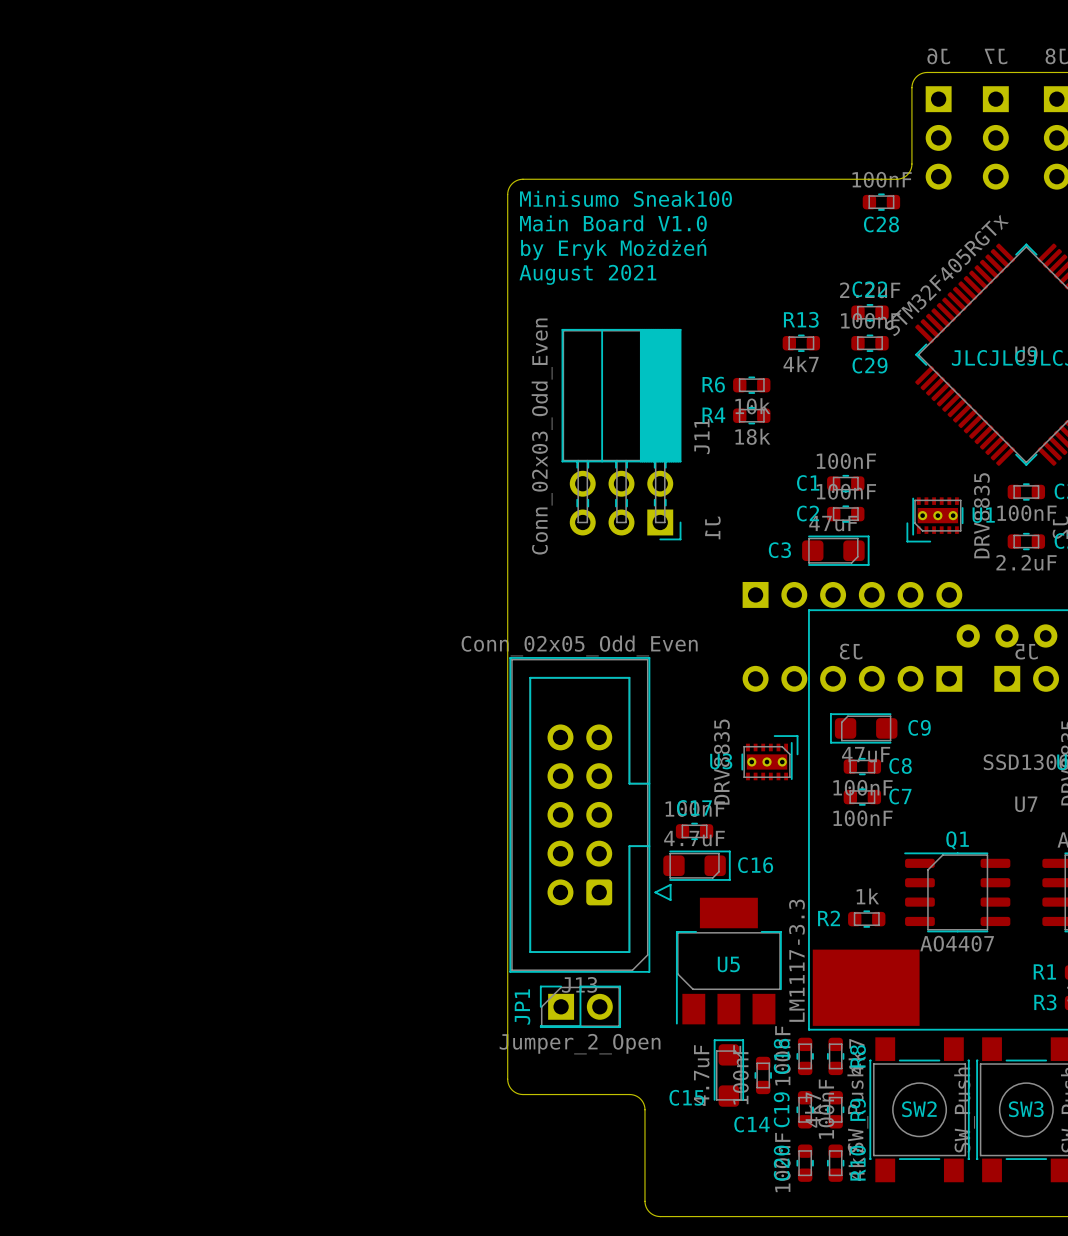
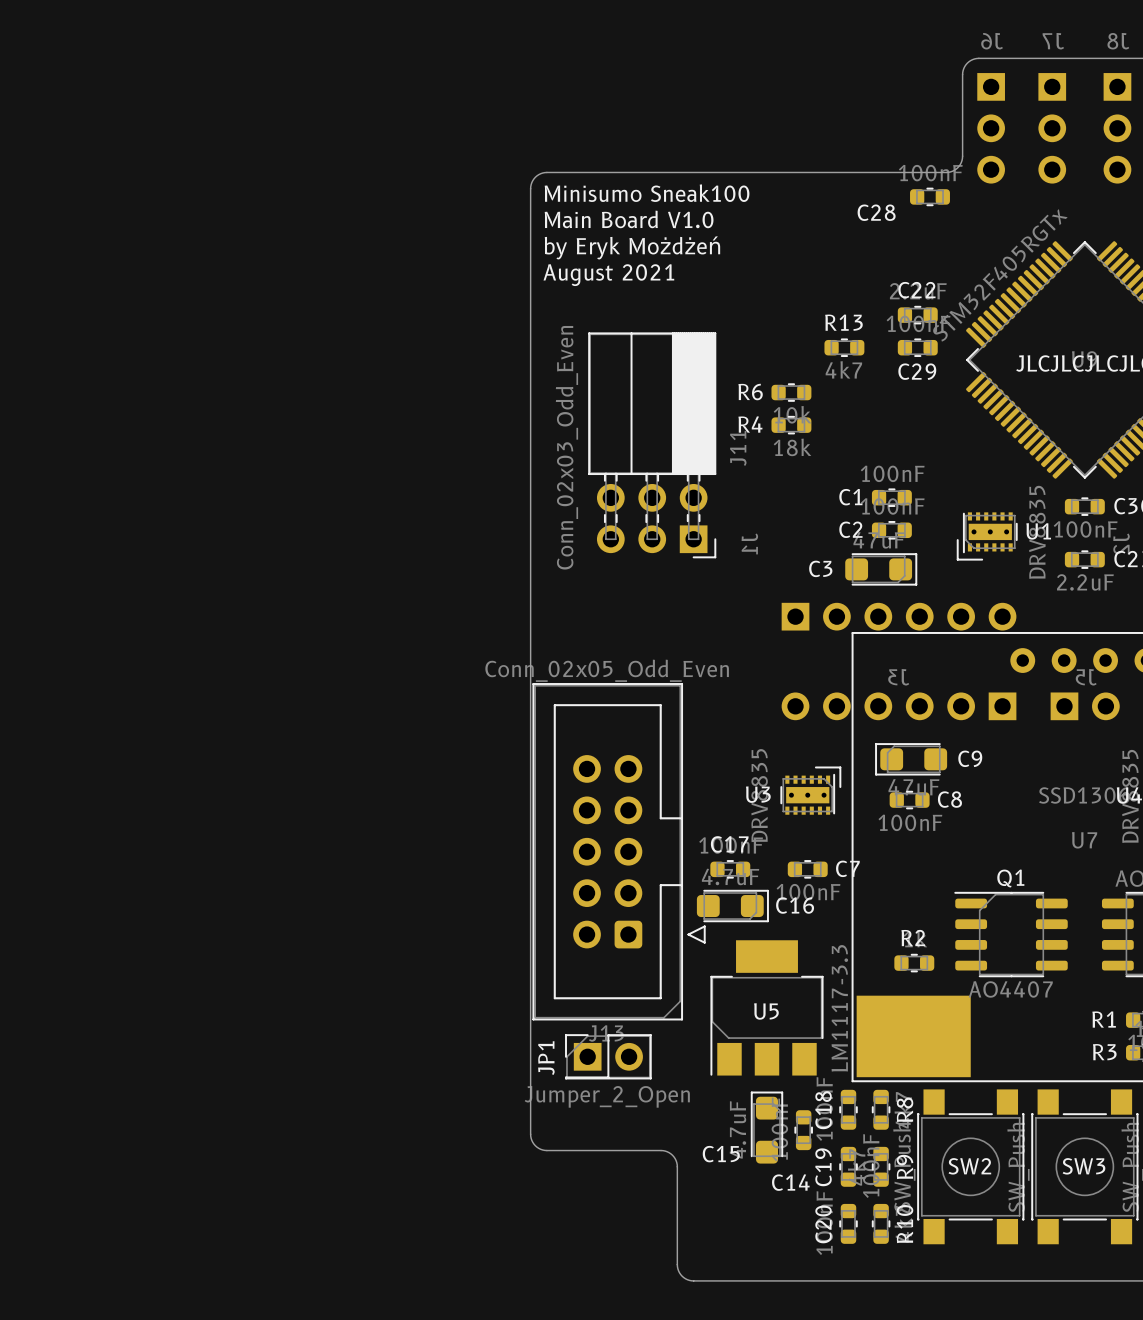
C28 name position: C28 (881, 224) -> C28 (876, 212)
C7 position: (862, 797) -> (807, 869)
R2 name position: R2 (829, 918) -> R2 (913, 938)

